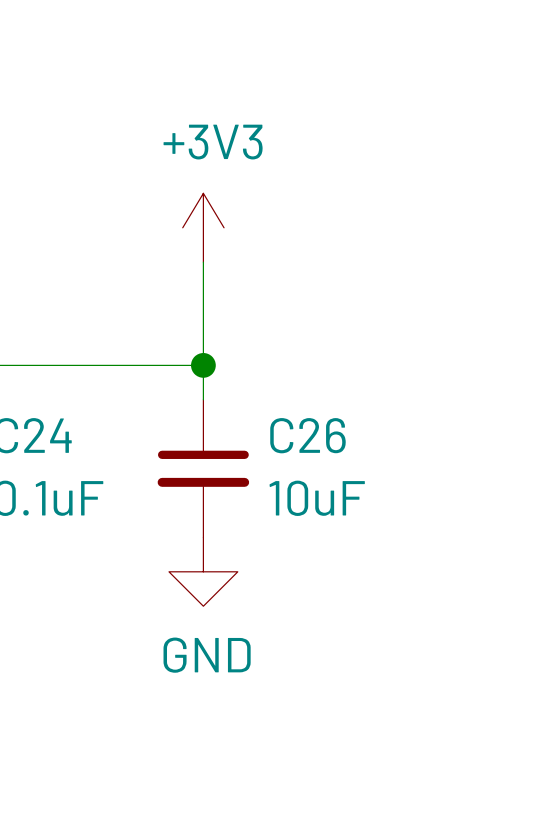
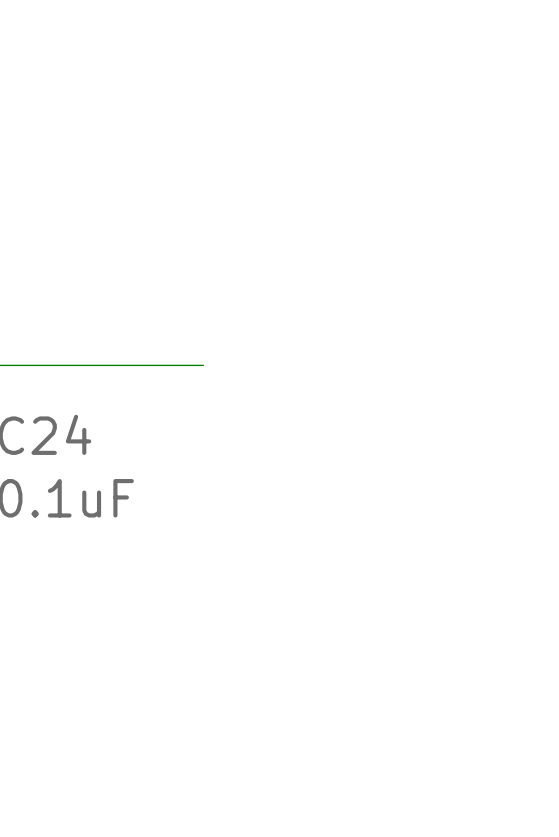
power symbol: +3V3 (203, 227) -> none
wire: (203, 262) (203, 399) -> none
junction: (203, 365) -> none
C26: 10uF (203, 468) -> none
power symbol: GND (203, 571) -> none

